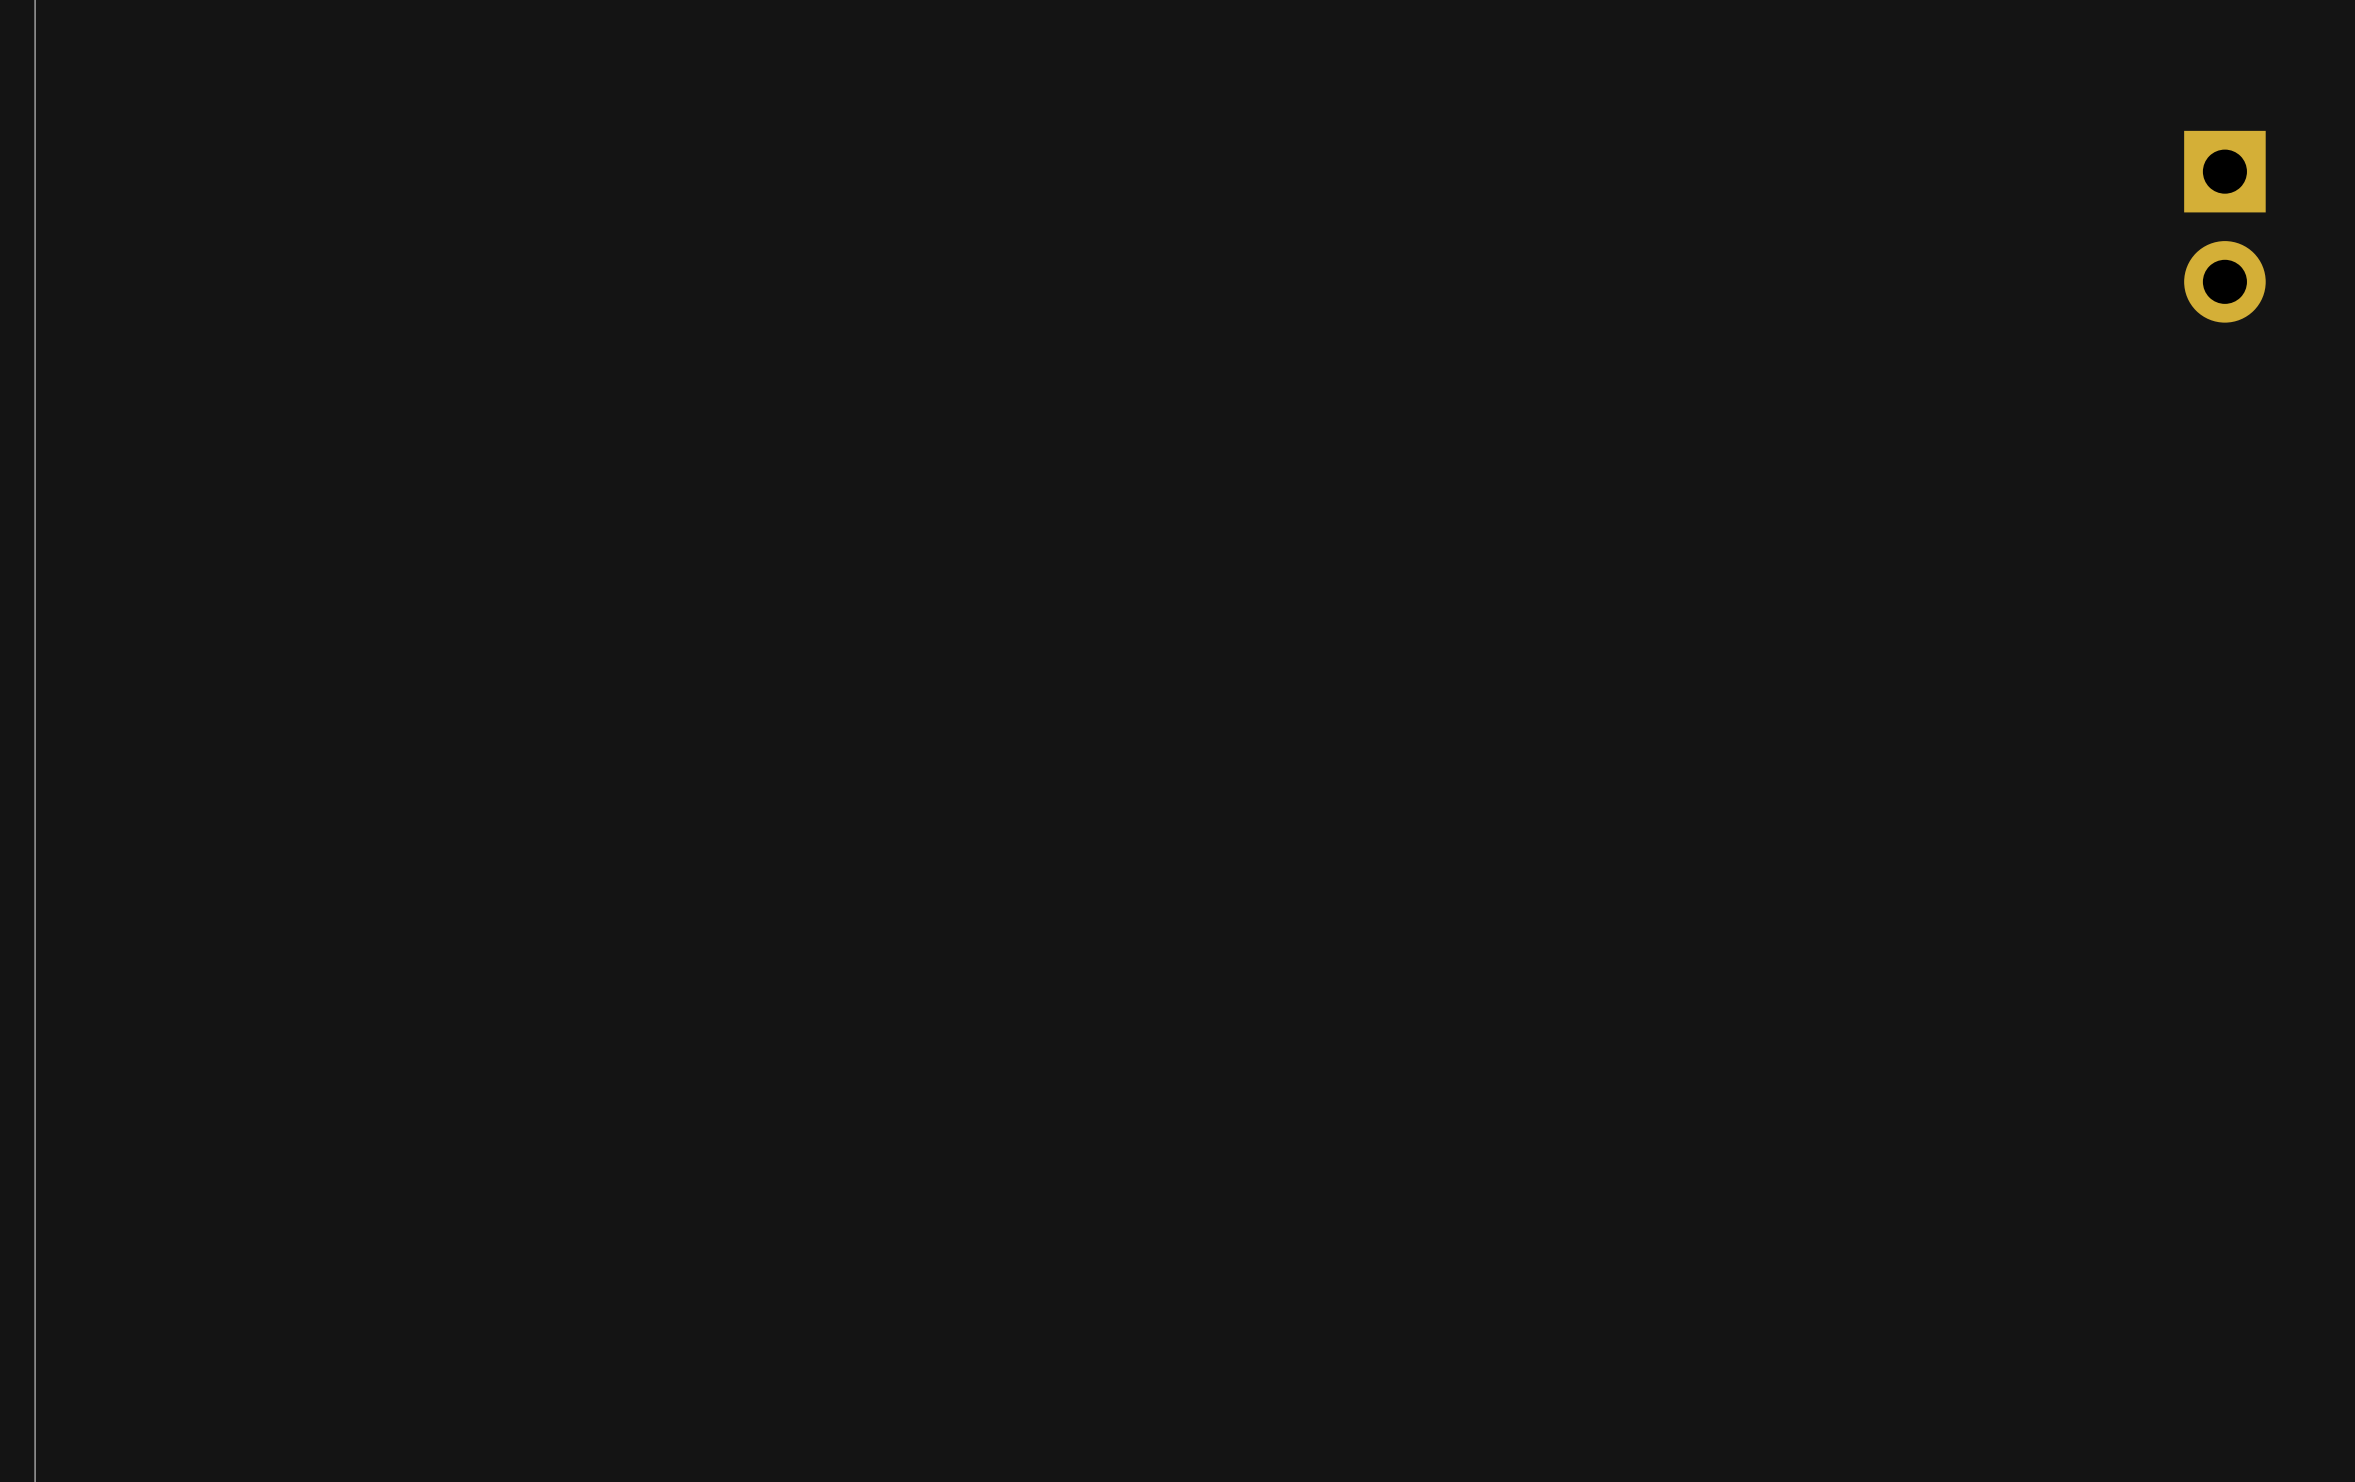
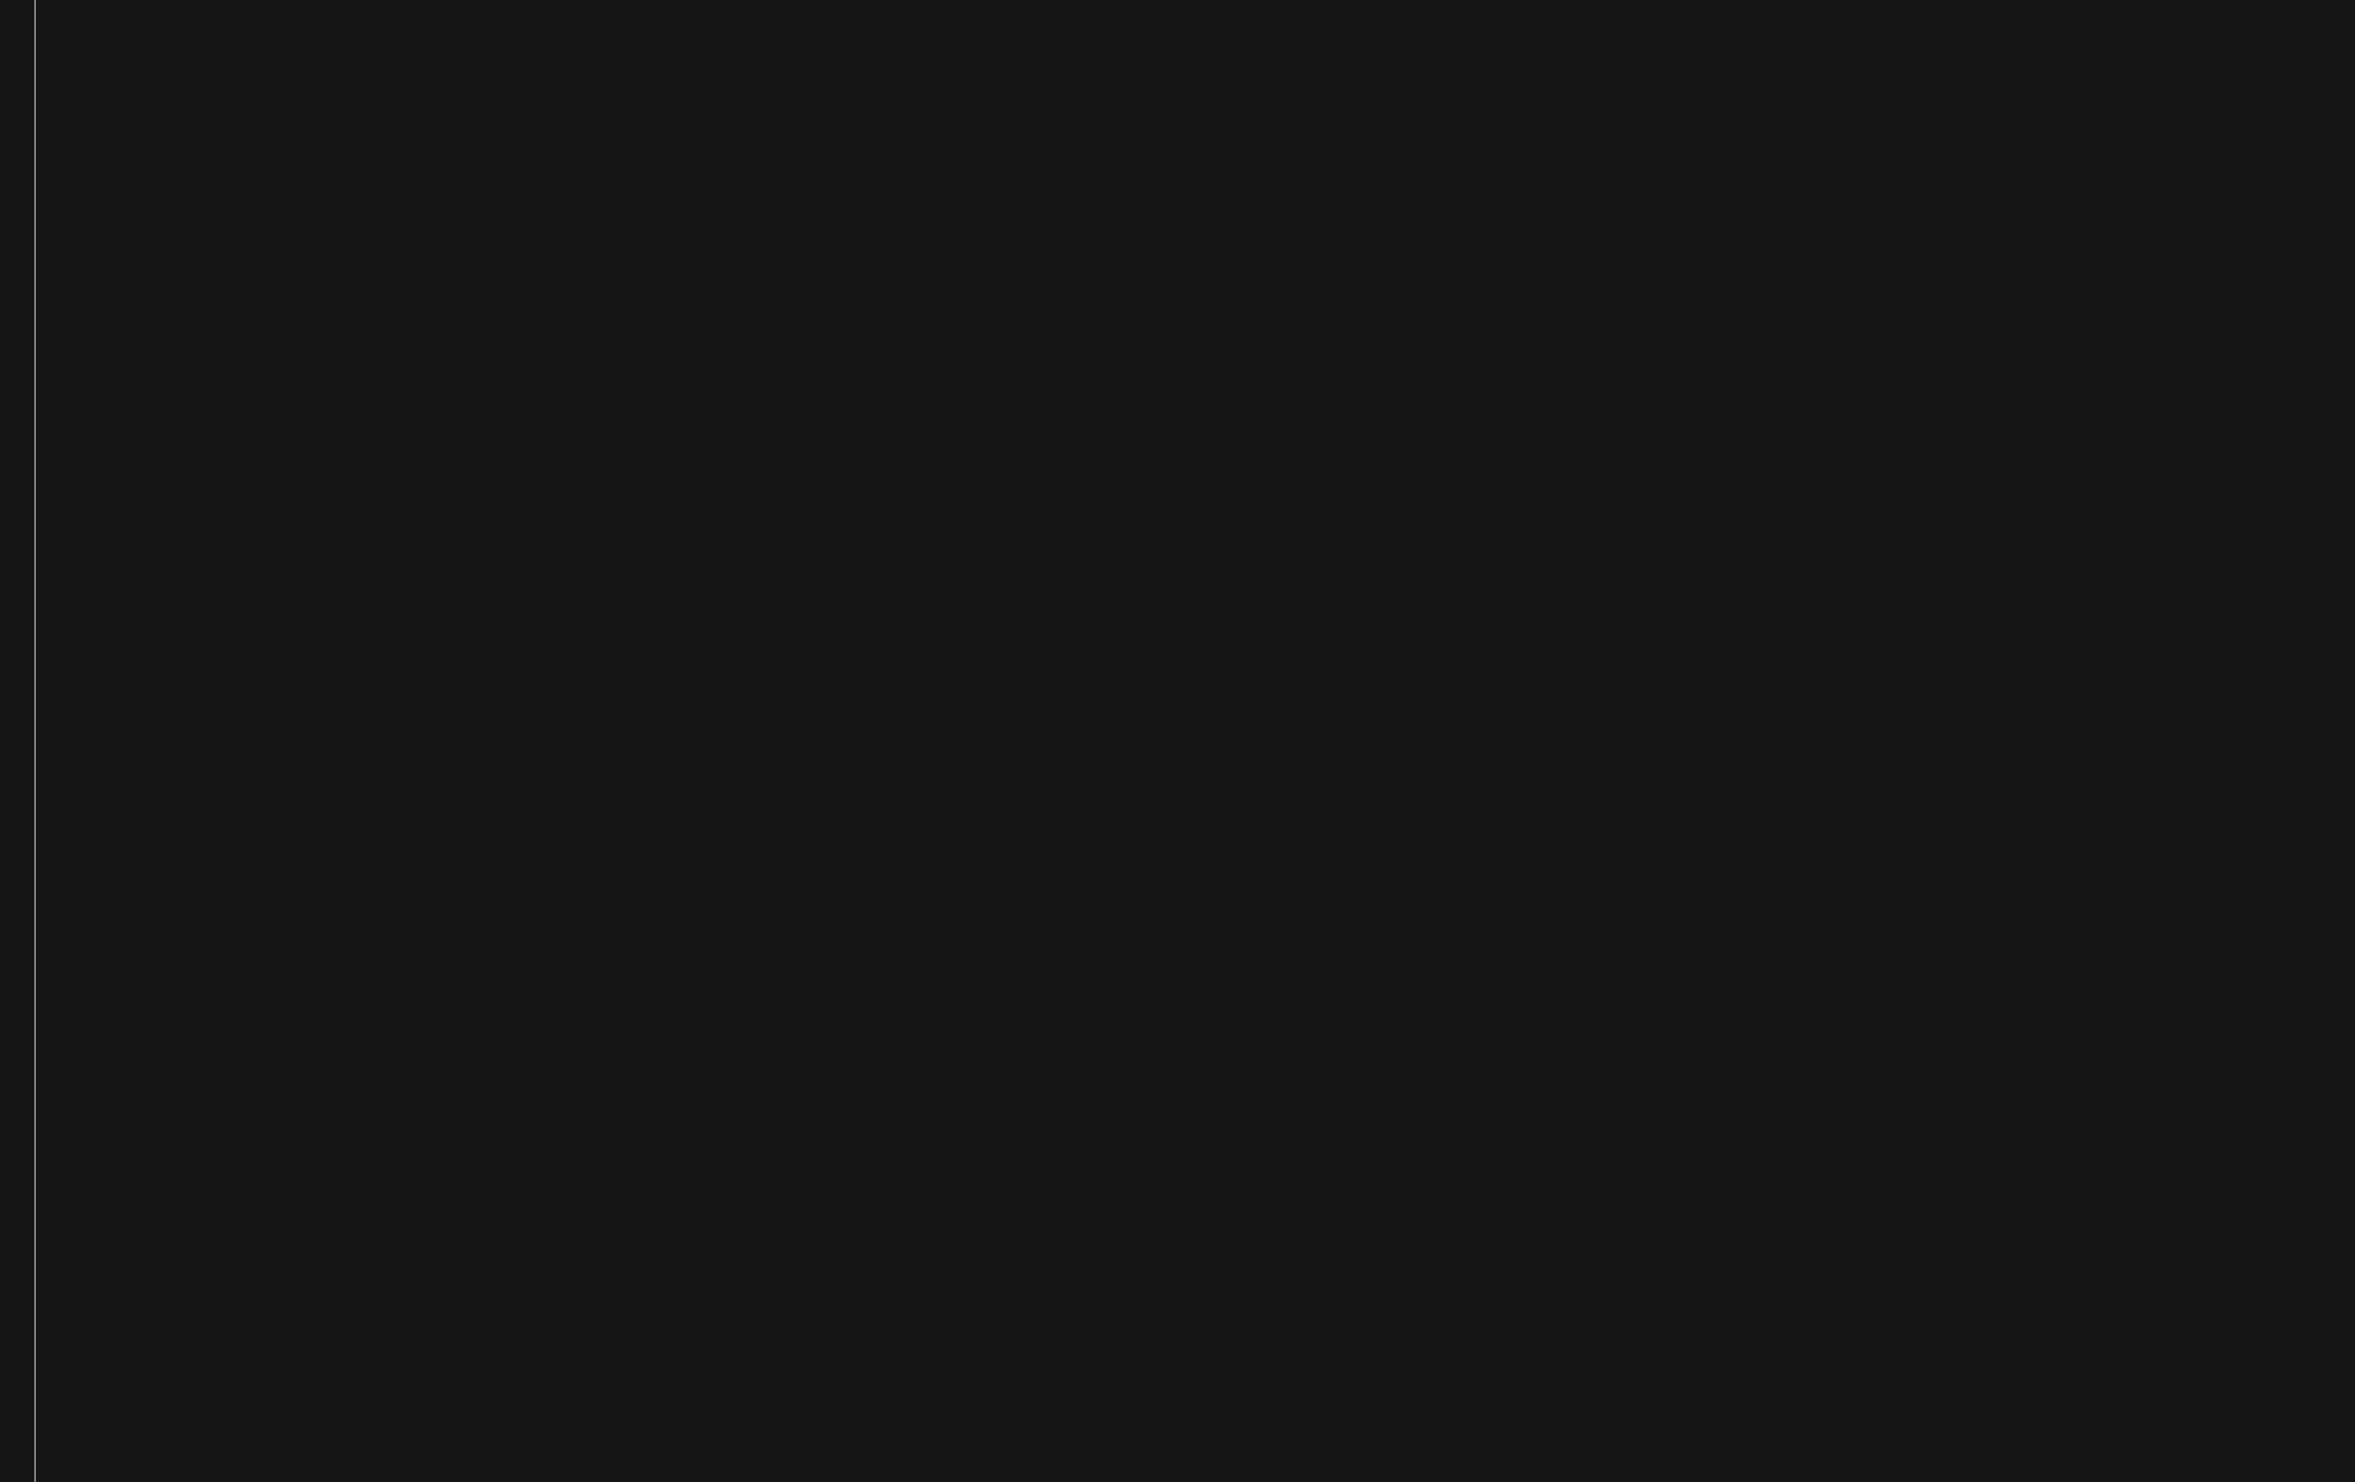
part: (2224, 226) -> none

